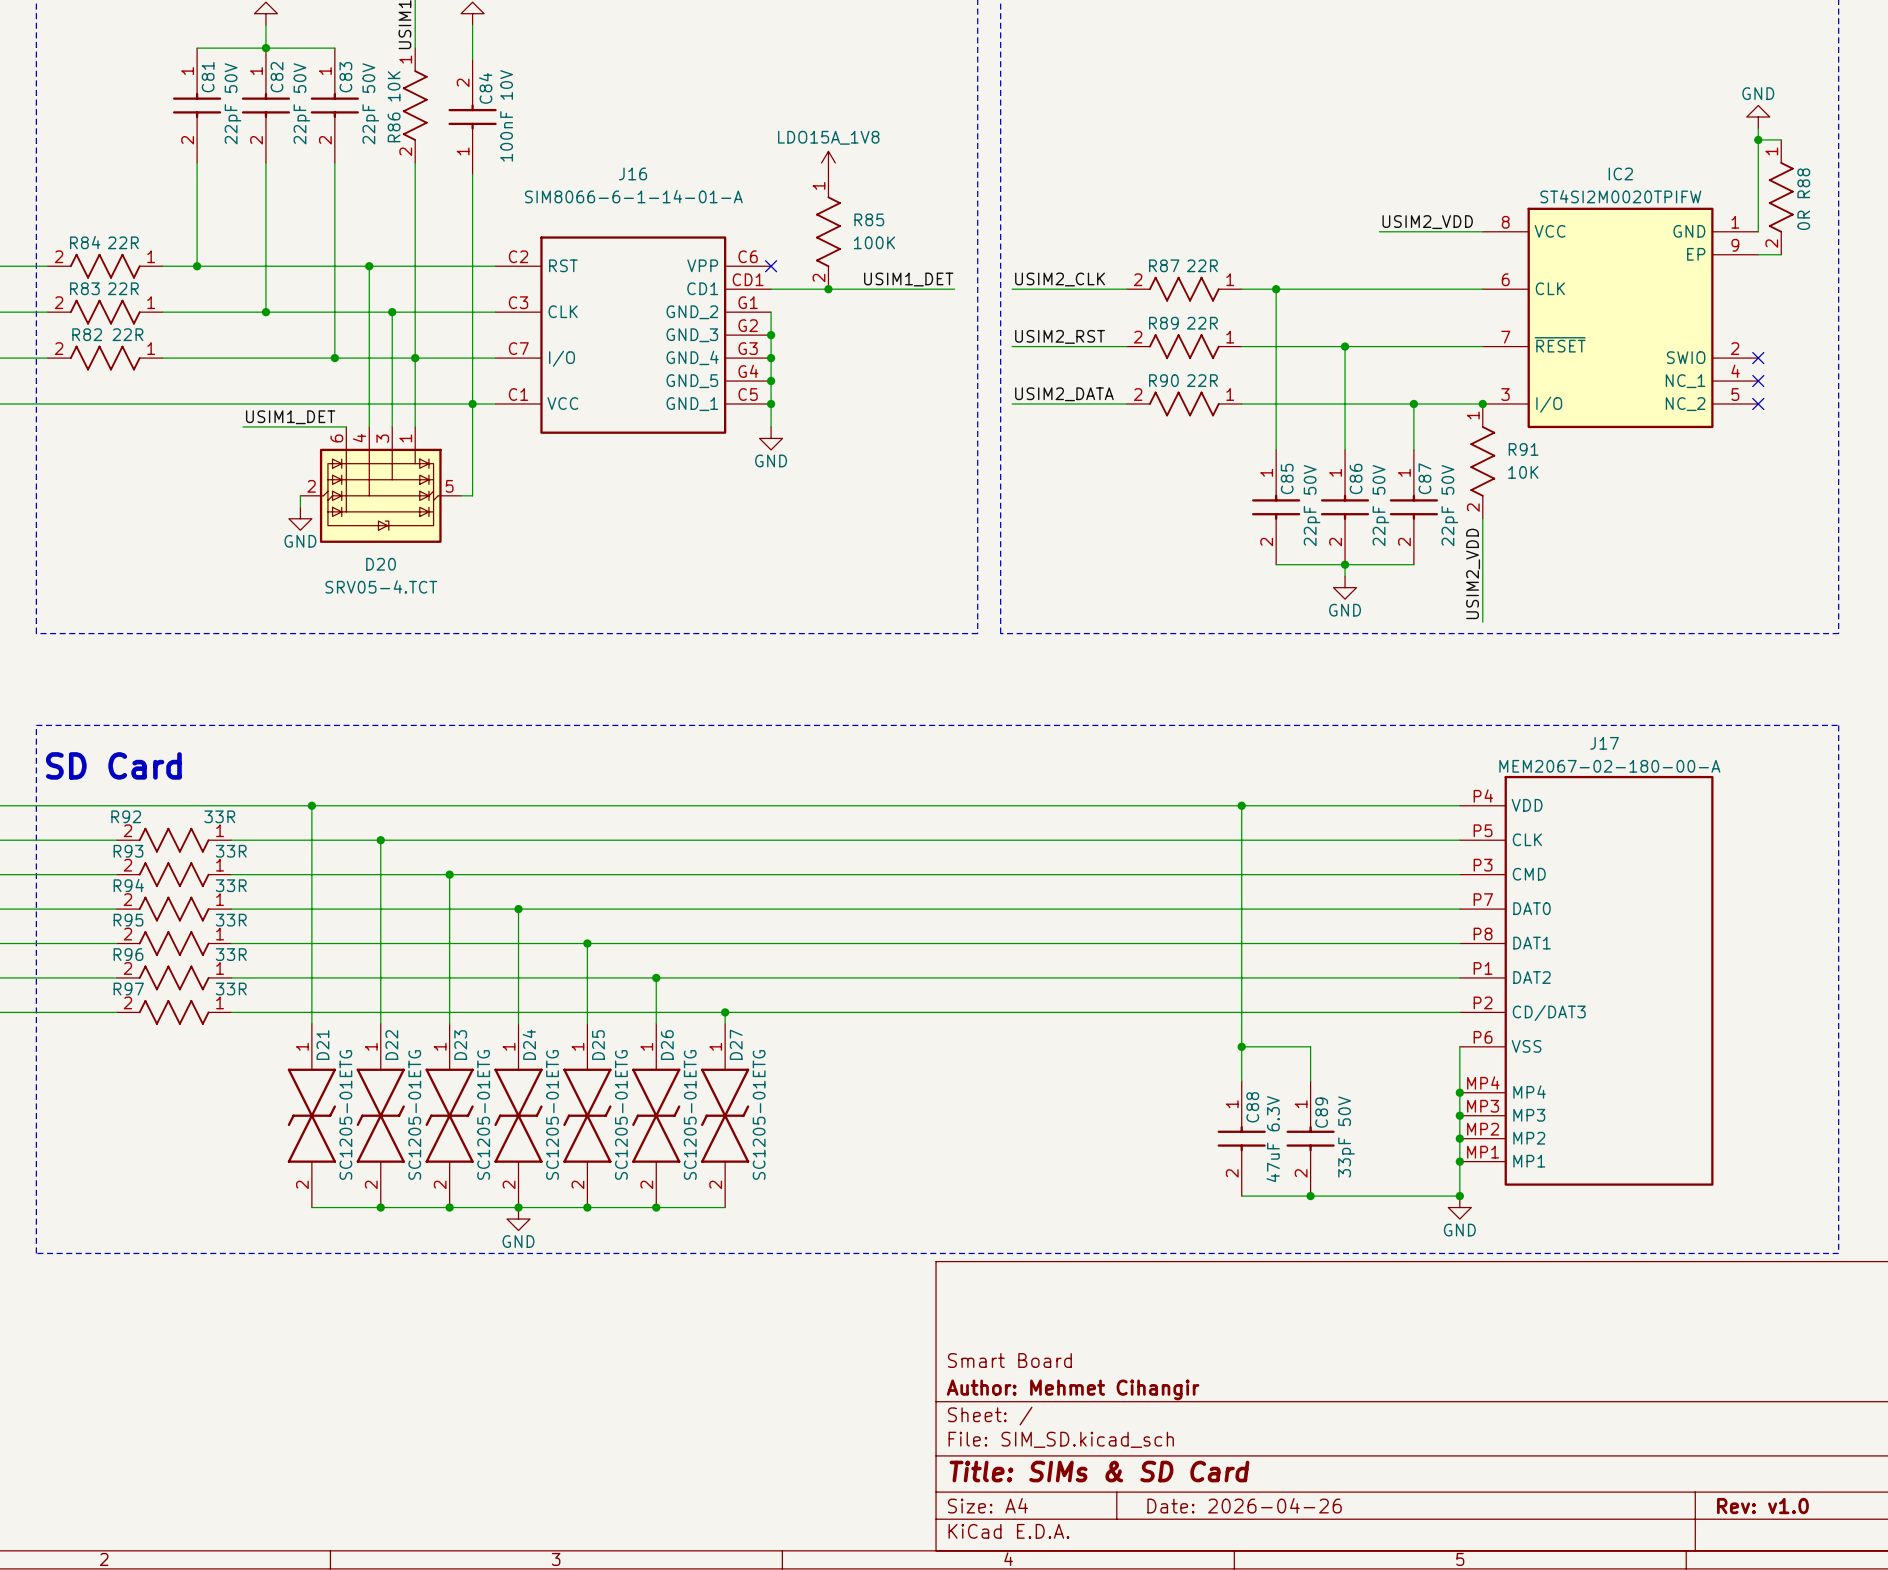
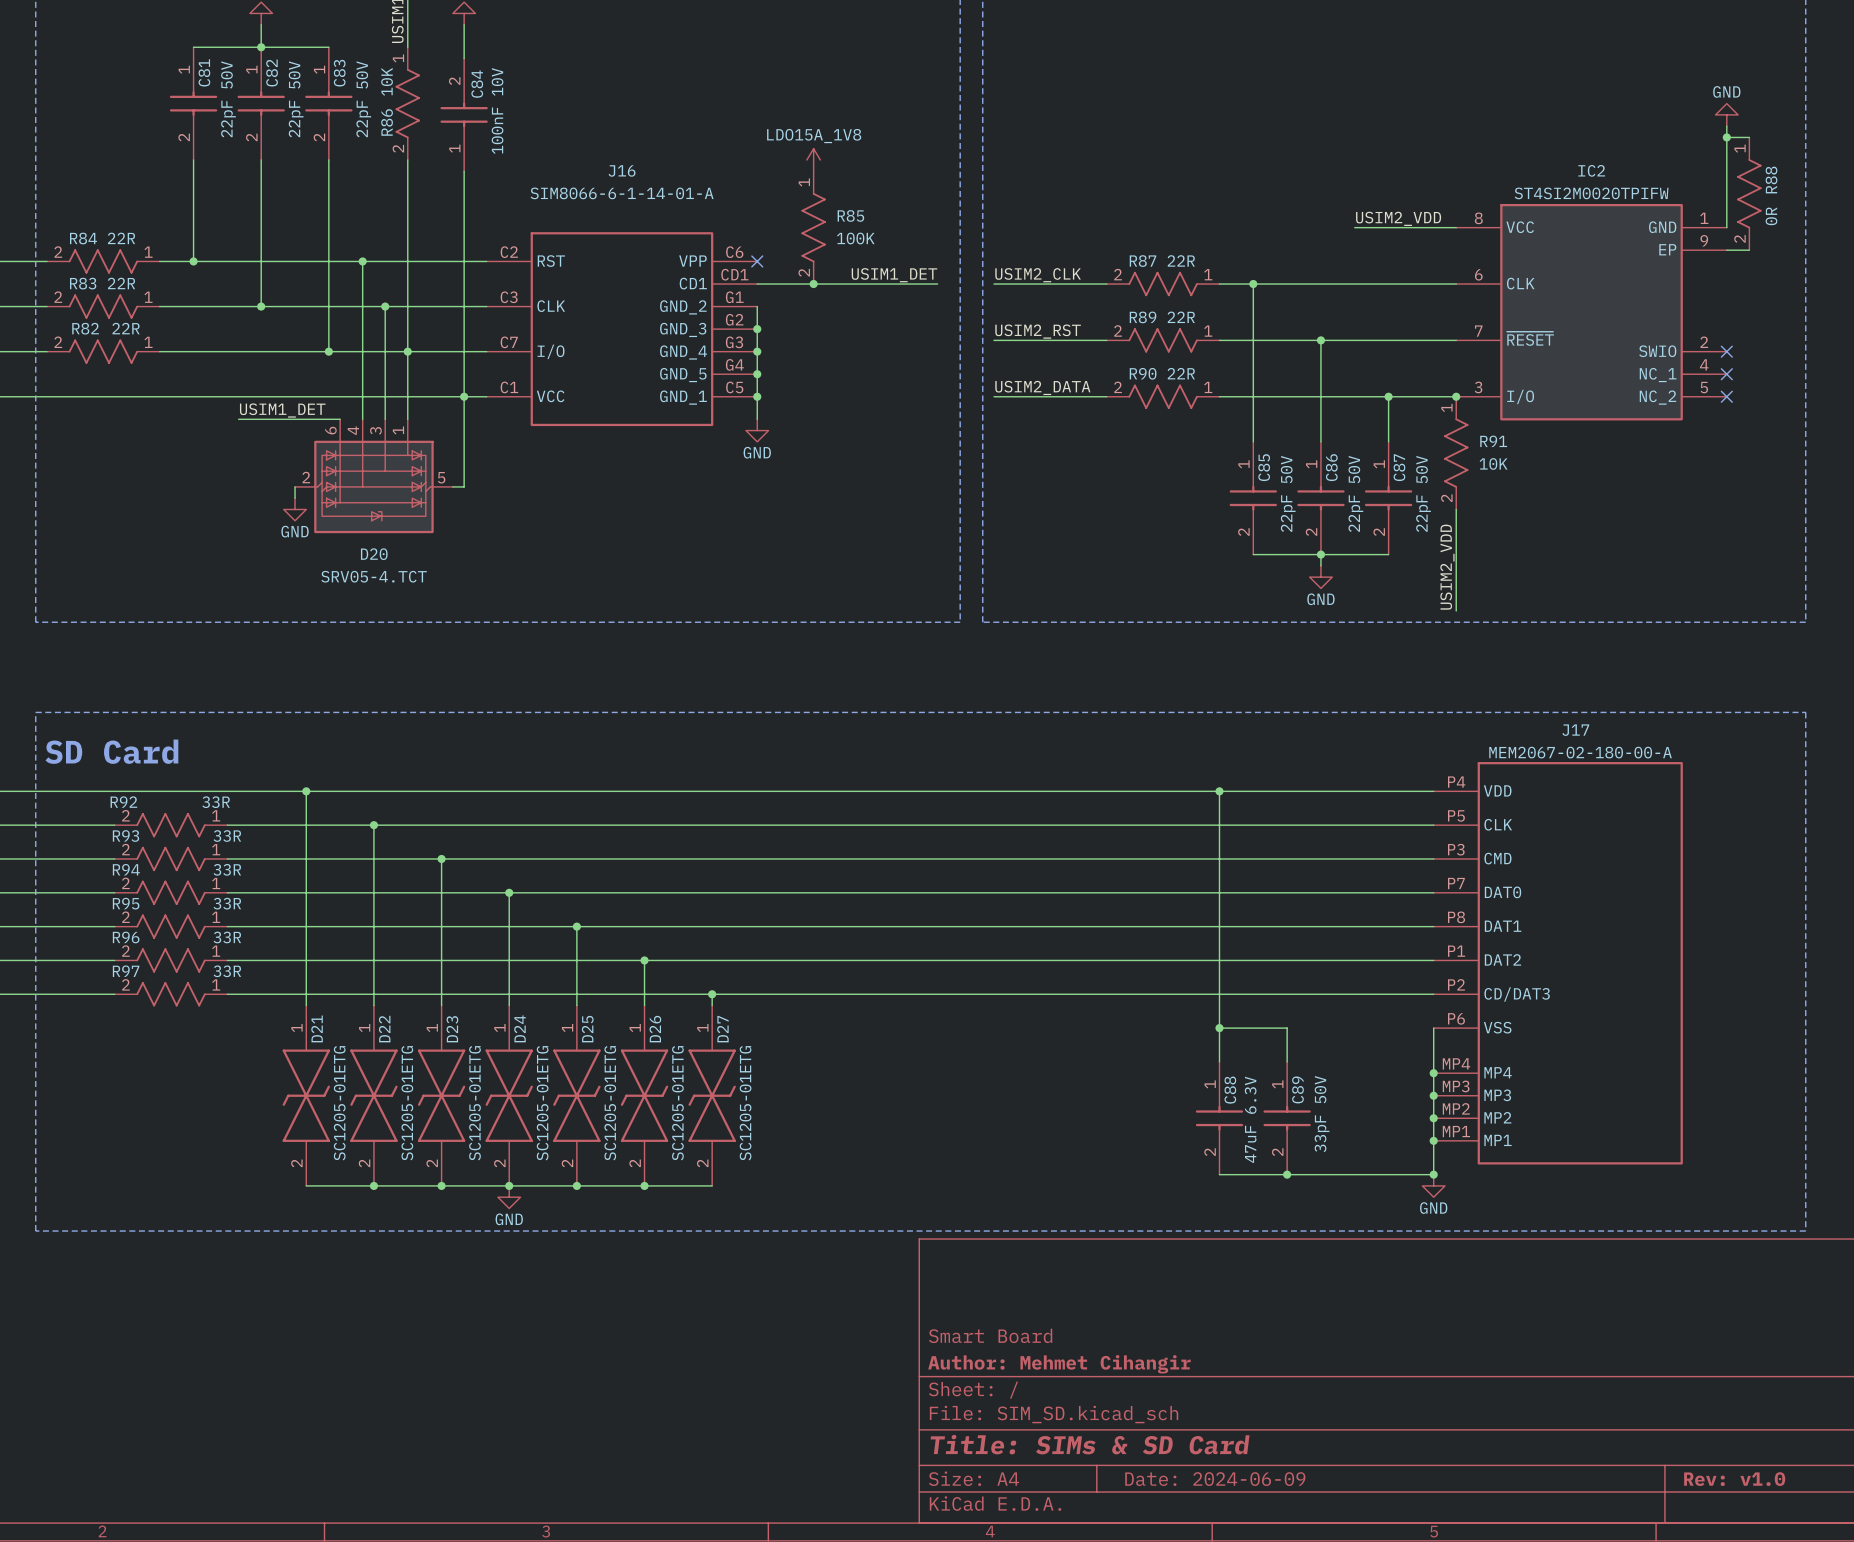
title block: Date: 2026-04-26 (1244, 1505) -> Date: 2024-06-09 (1215, 1479)

